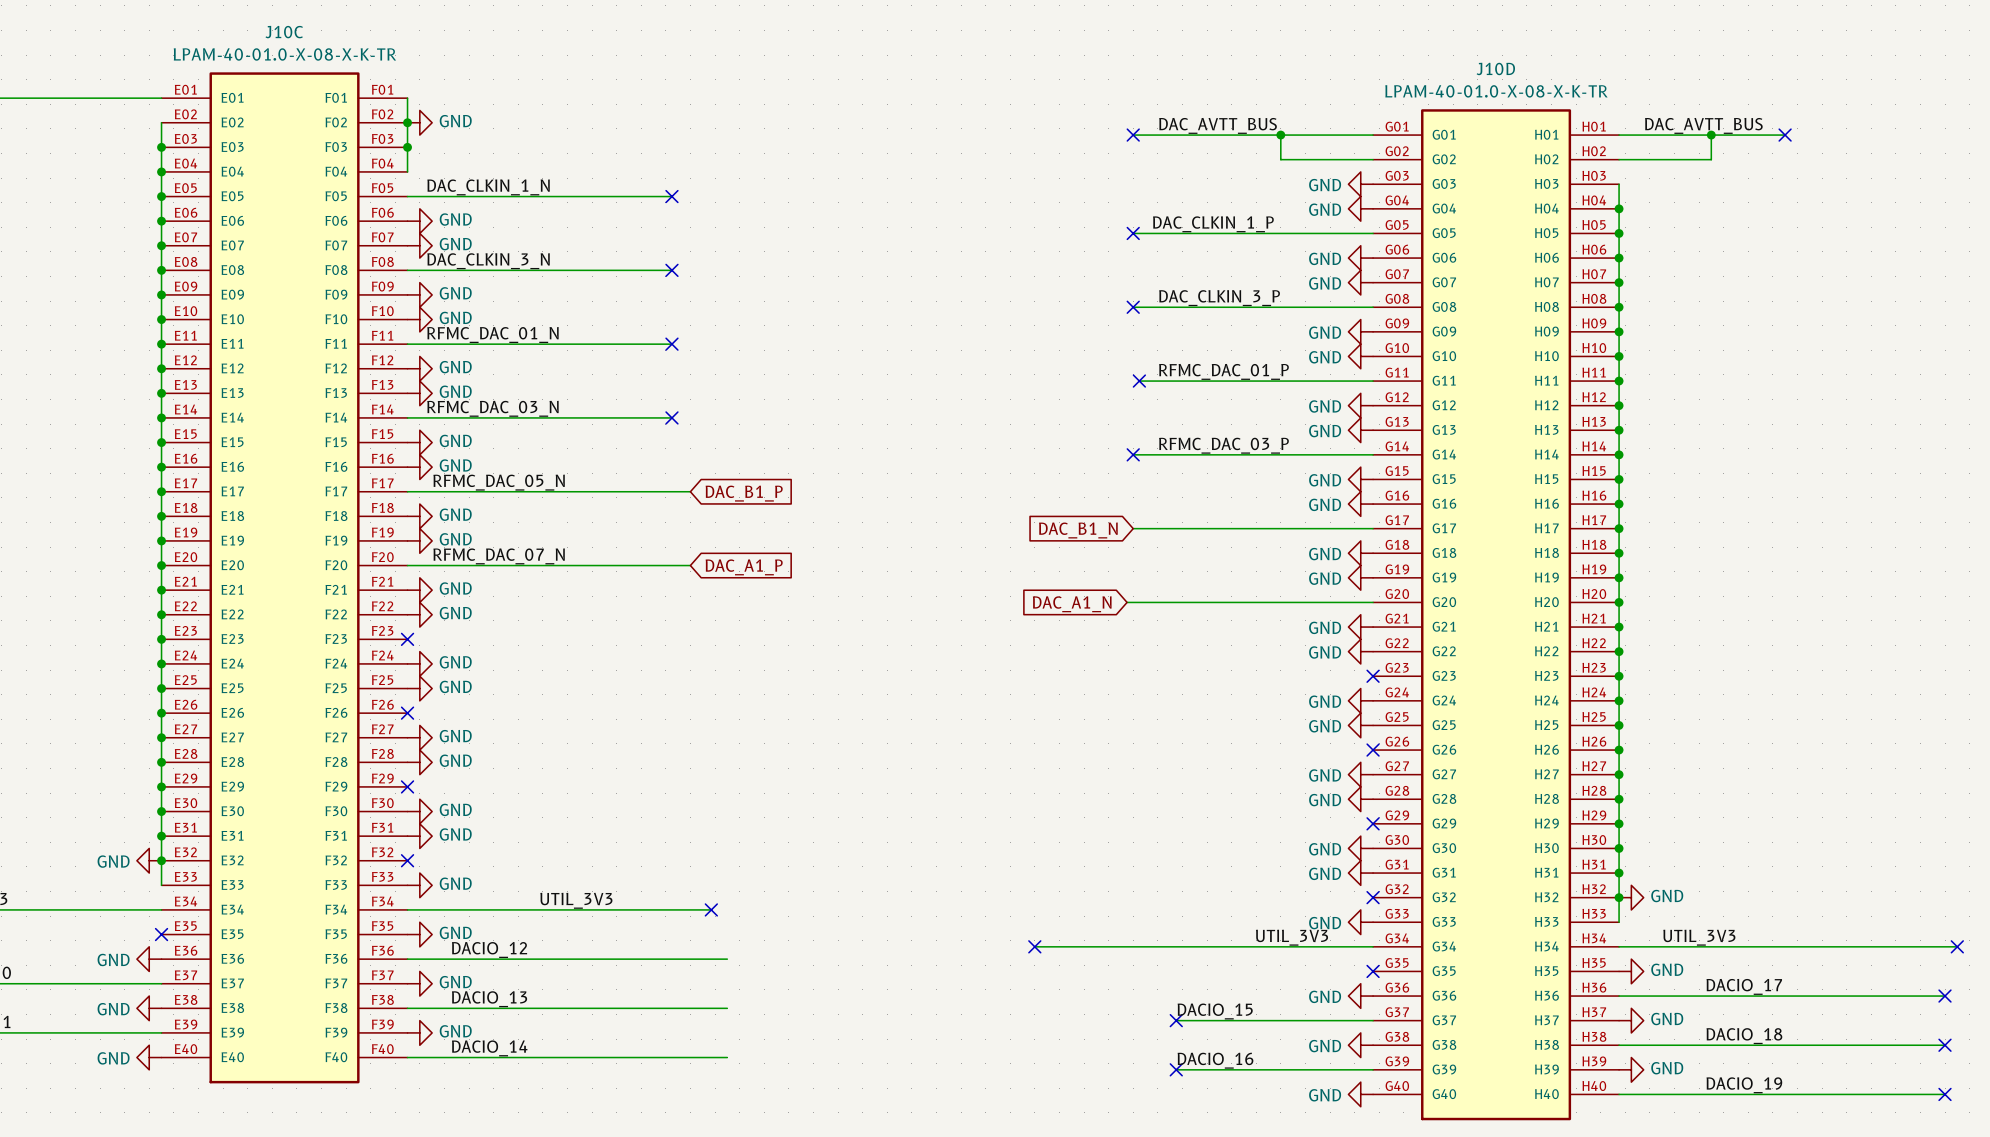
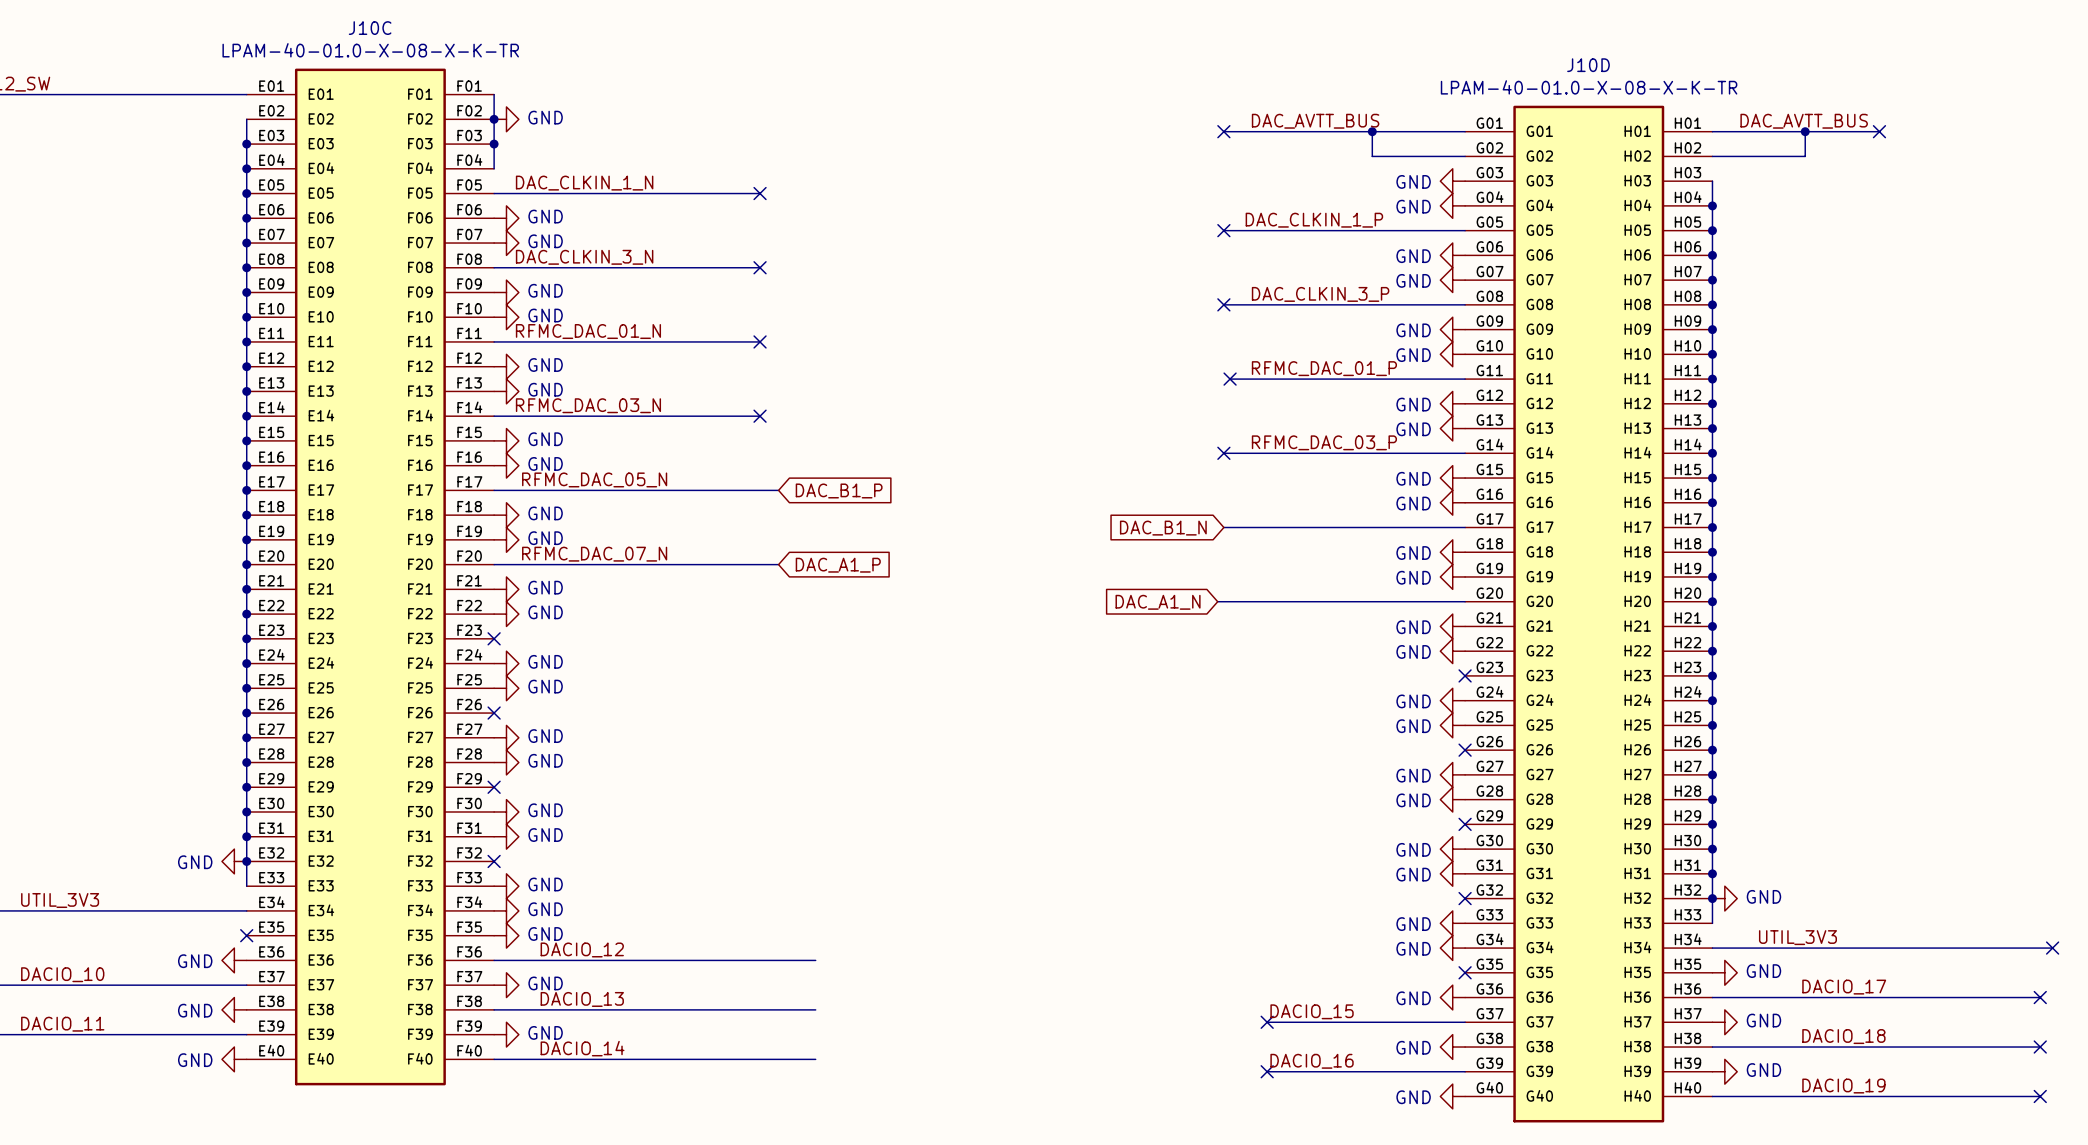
label: UTIL_3V3 (576, 900) -> none
wire: (407, 909) (711, 909) -> none
power symbol: none -> GND (506, 910)
no-connect mark: (711, 909) -> none
label: UTIL_3V3 (1292, 937) -> none
wire: (1034, 946) (1373, 946) -> none
no-connect mark: (1034, 946) -> none
power symbol: none -> GND (1452, 948)

